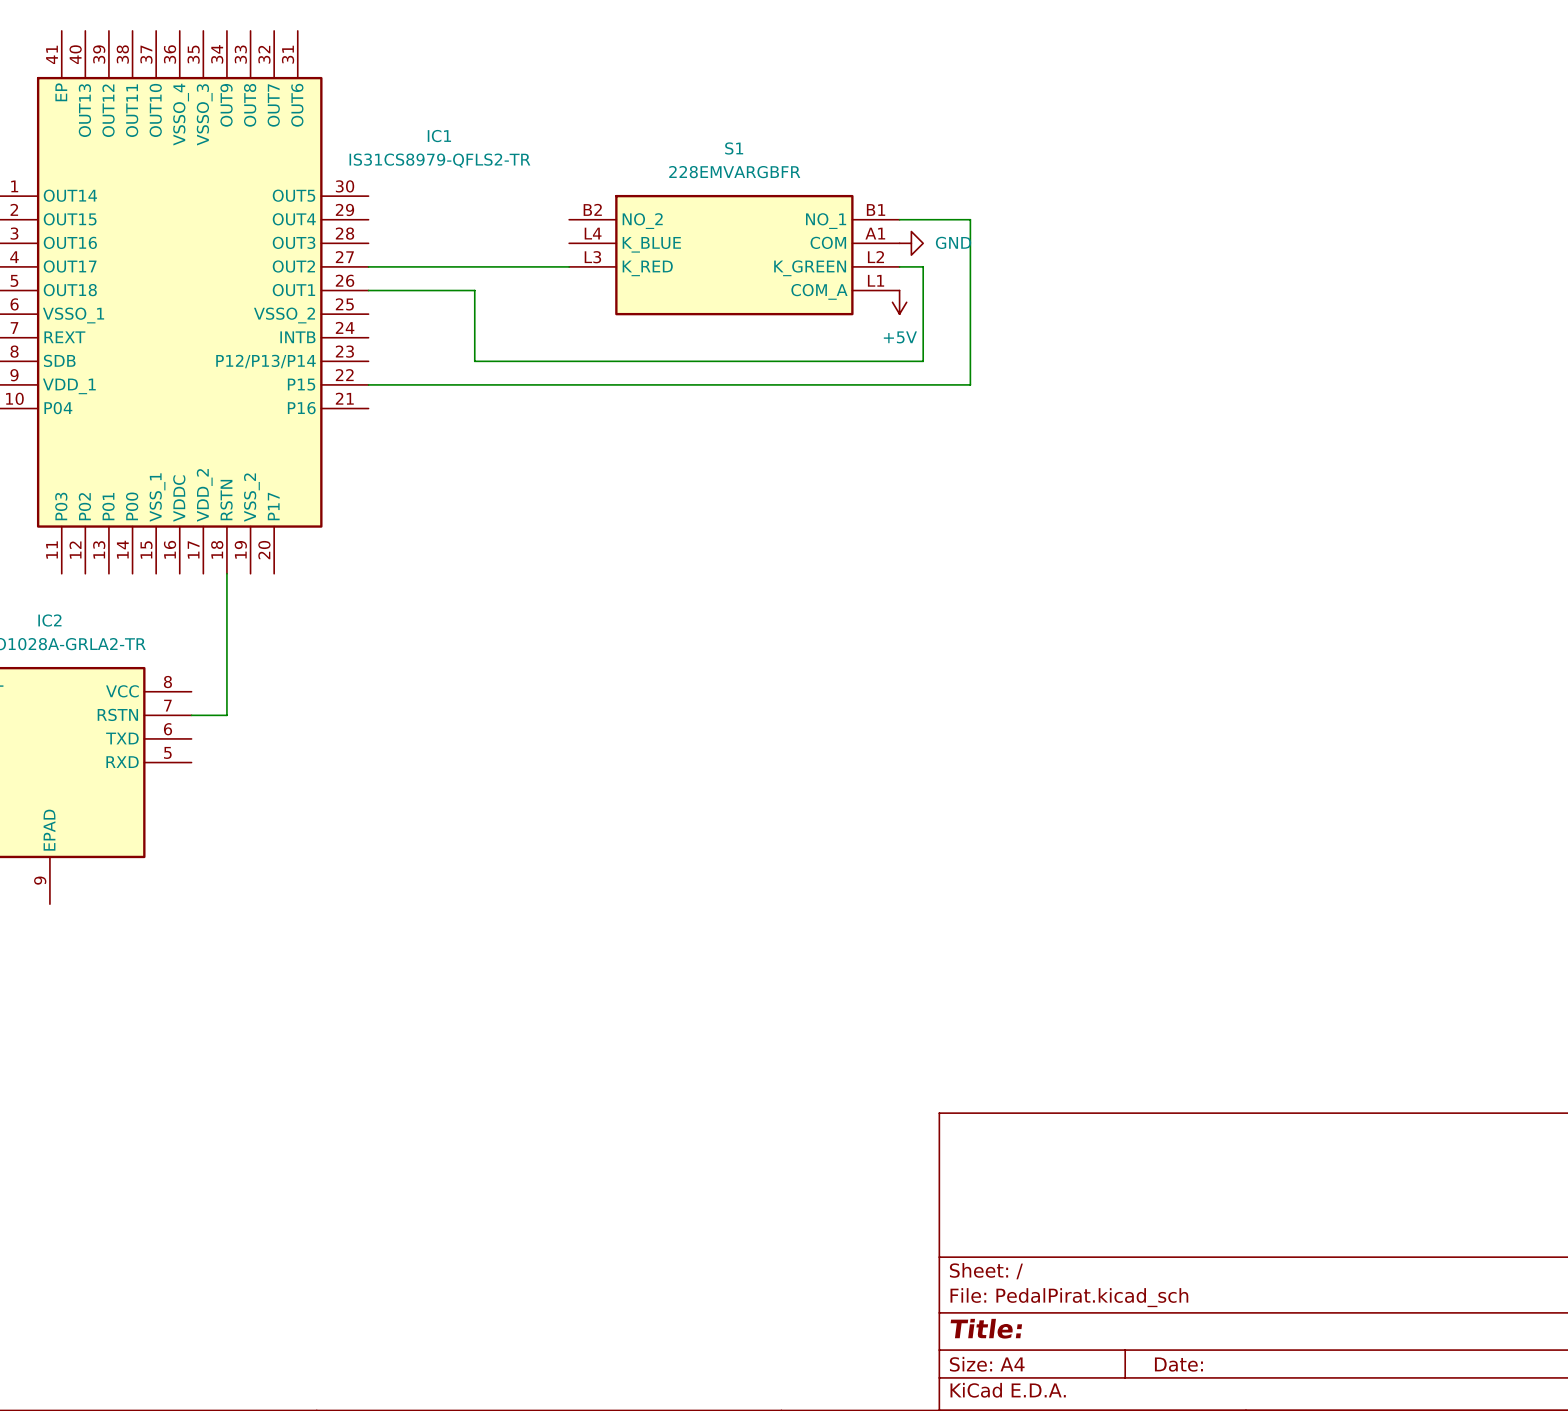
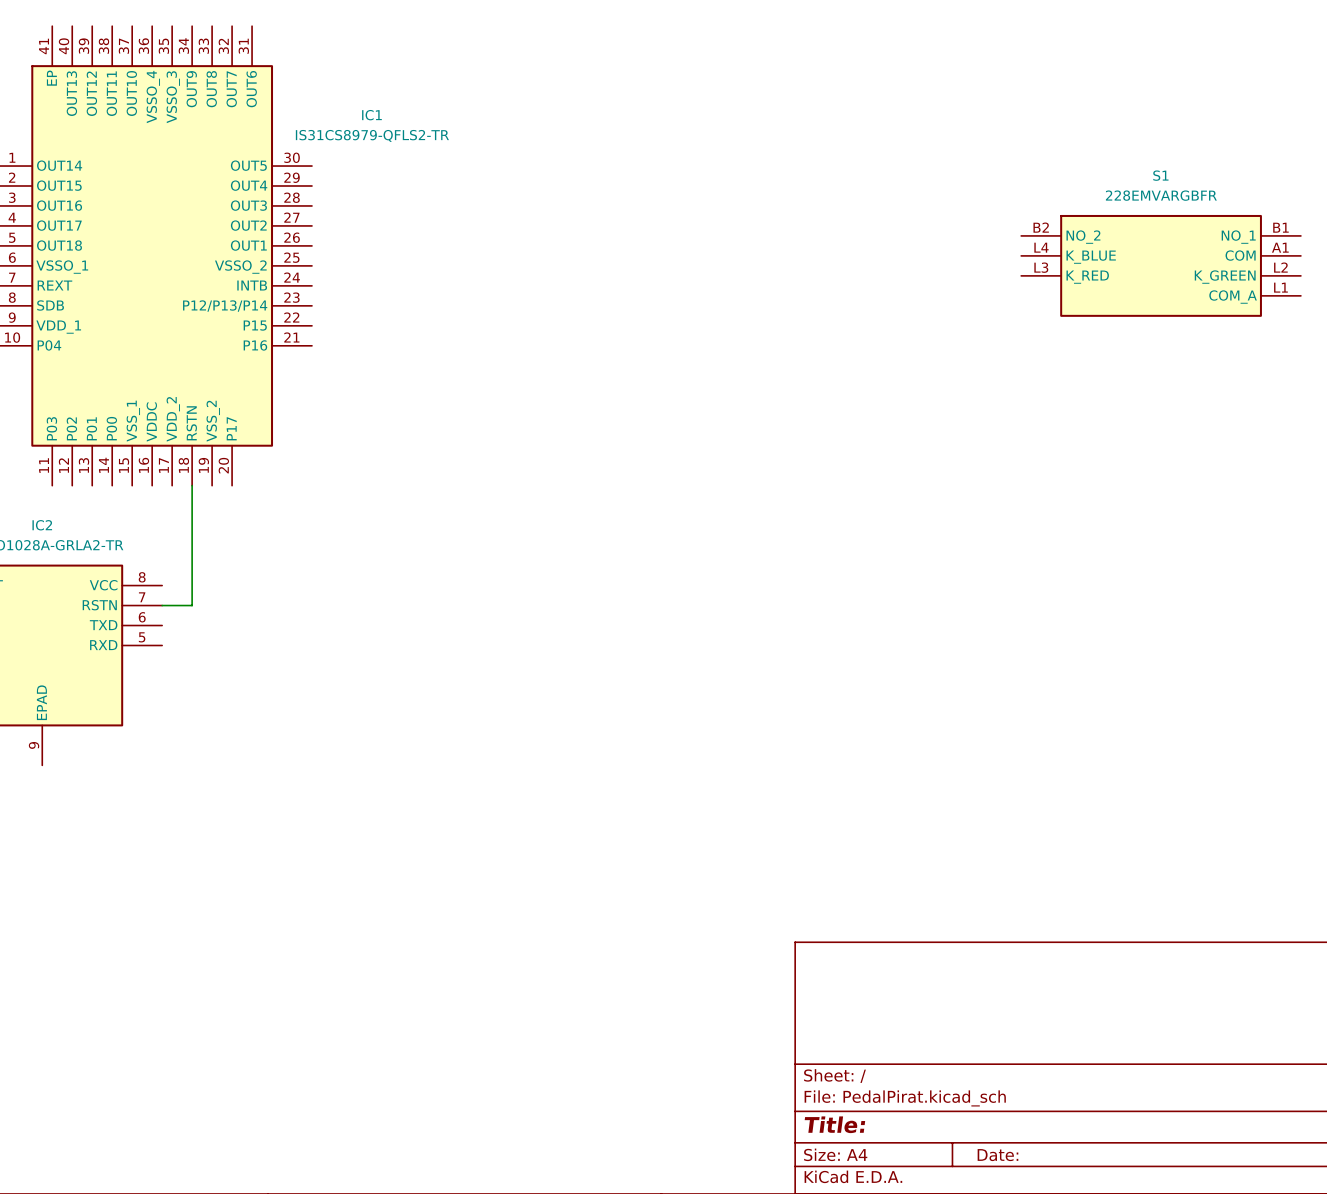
wire: (899, 219) (970, 219) (970, 384) (368, 384) -> none
power symbol: GND (911, 243) -> none
S1 position: (734, 255) -> (1161, 265)
wire: (368, 266) (569, 266) -> none
wire: (899, 266) (923, 266) (923, 361) (474, 361) (474, 290) (368, 290) -> none
power symbol: +5V (899, 302) -> none

